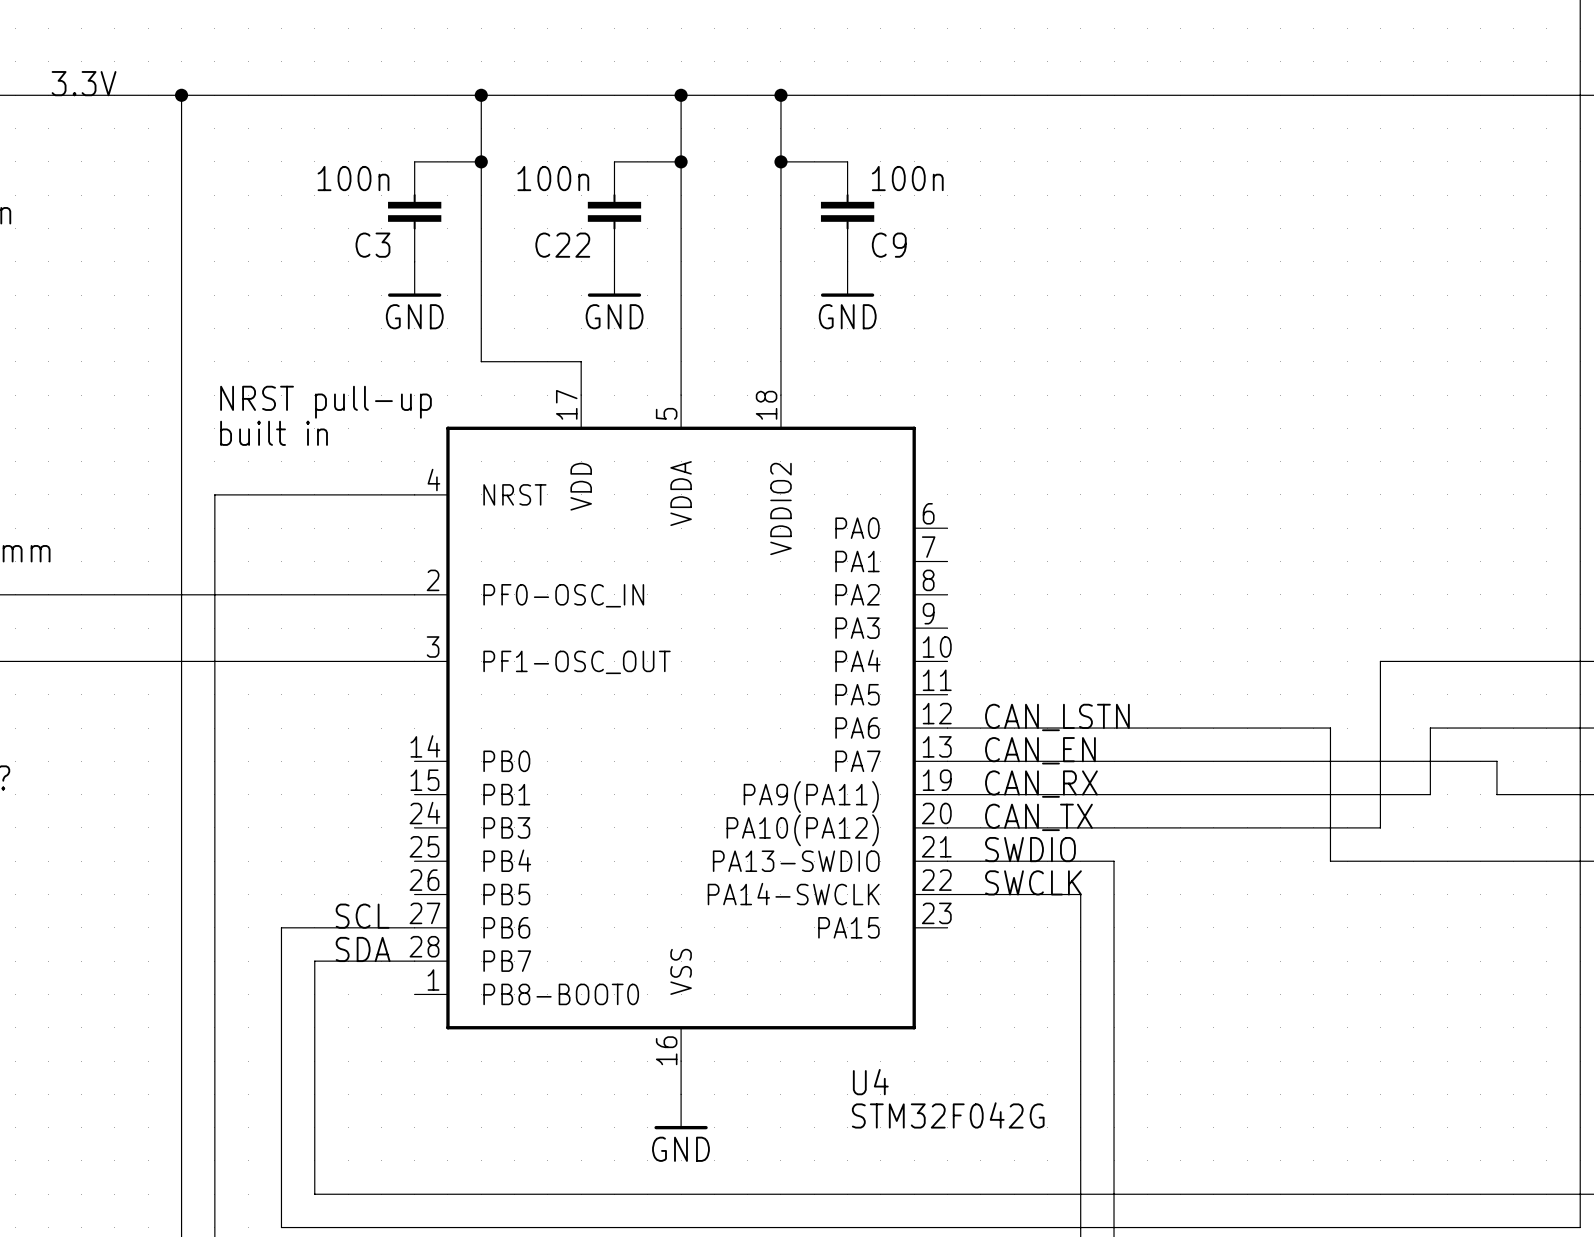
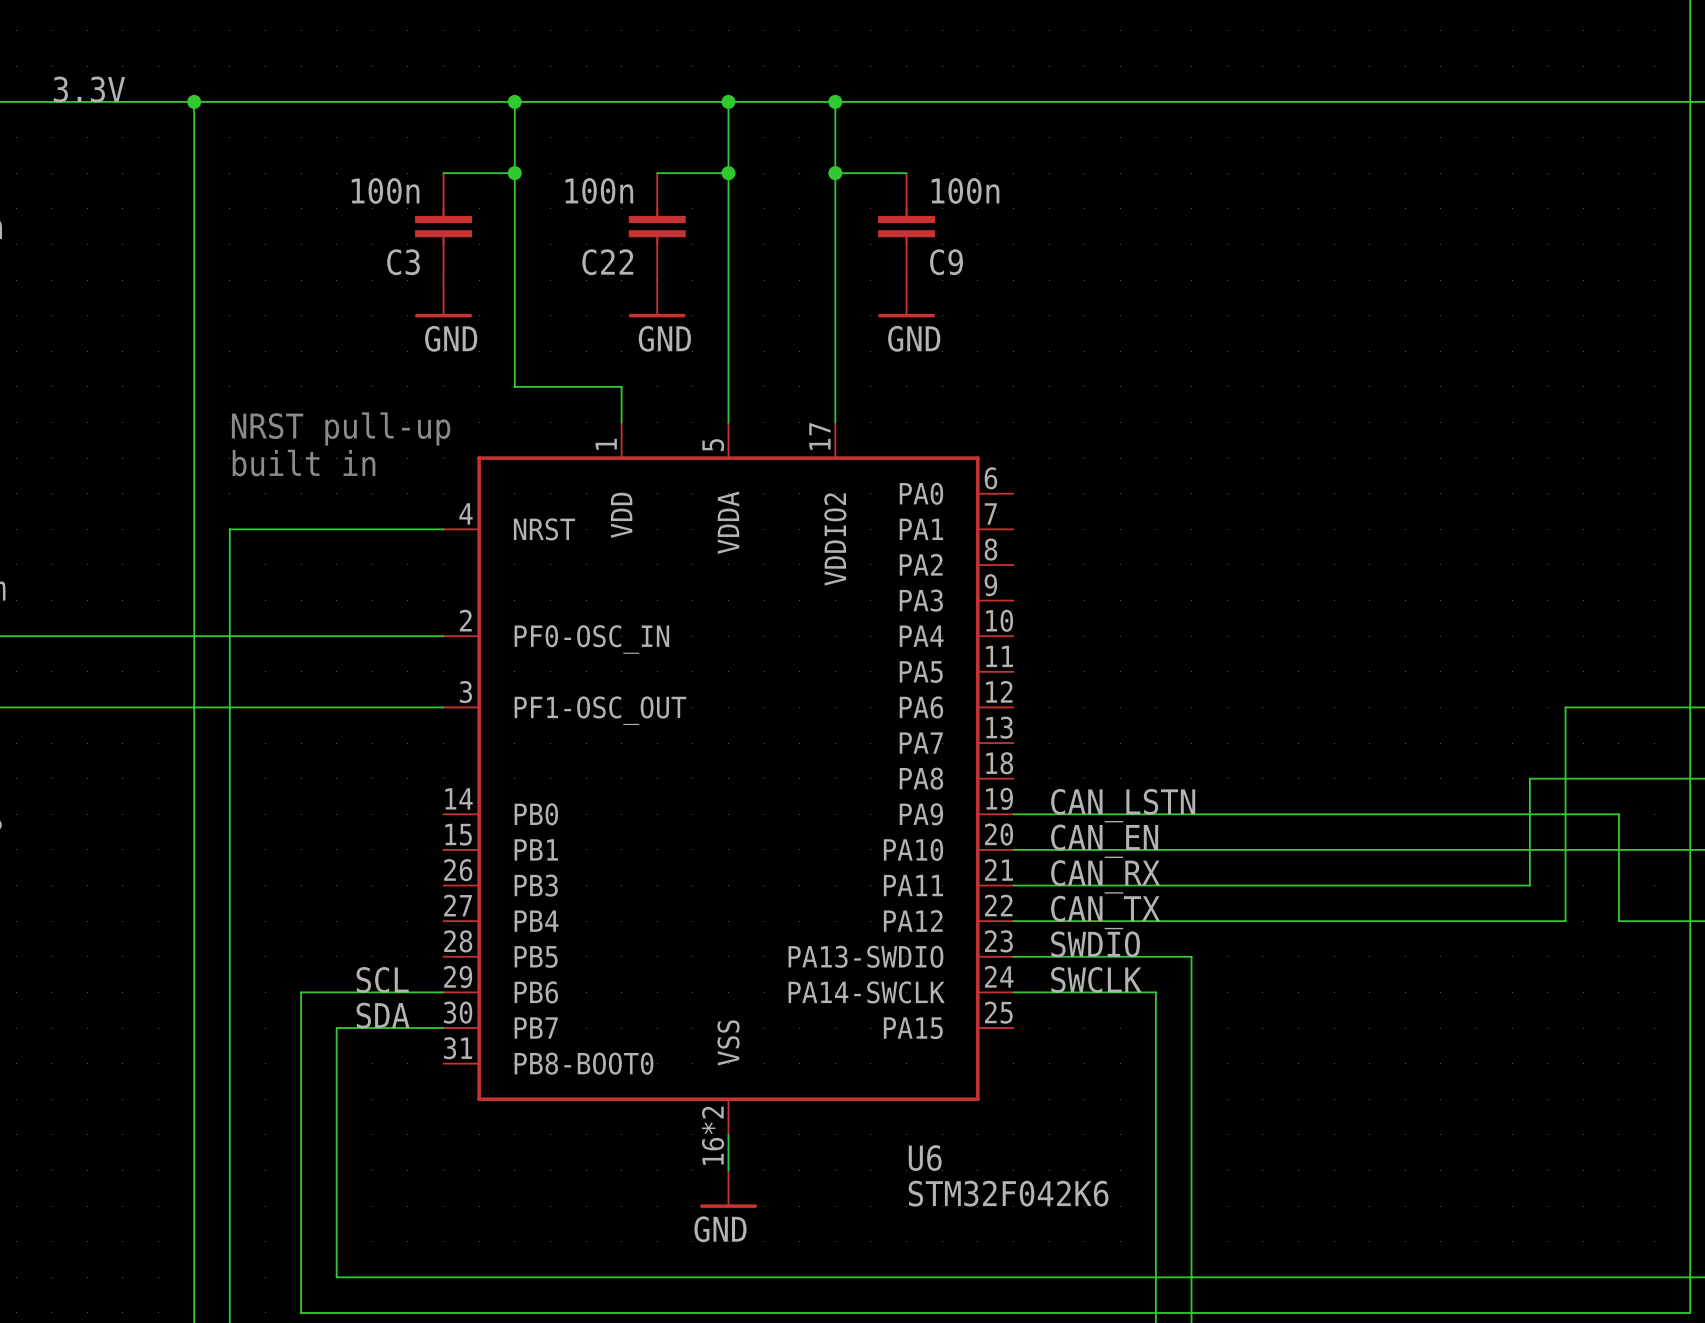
wire: (1463, 661) (1380, 661) (1380, 827) -> (1565, 707) (1565, 921)
label: CAN_LSTN (1057, 717) -> none
U4: STM32F042G (681, 728) -> none
U6: none -> STM32F042K6 (728, 778)
wire: (947, 728) (1330, 728) (1330, 861) -> (1191, 921) (1423, 921)
label: CAN_EN (1040, 750) -> CAN_LSTN (1123, 805)
wire: (1496, 761) (1496, 794) -> (1601, 814) (1618, 814) (1618, 921)
label: CAN_RX (1041, 784) -> CAN_EN (1104, 841)
wire: none -> (1601, 849) (1529, 849) (1529, 885) (1476, 885)
label: CAN_TX (1038, 817) -> CAN_RX (1105, 876)
label: SWDIO (1030, 849) -> CAN_TX (1105, 912)
wire: (1114, 861) (1114, 894) -> none
wire: (1463, 861) (1513, 861) -> none
label: SWCLK (1033, 882) -> SWDIO (1095, 944)
wire: (1080, 894) (1080, 927) -> (1155, 956) (1191, 956)
label: none -> SWCLK (1096, 979)
wire: none -> (1013, 992) (1155, 992)

